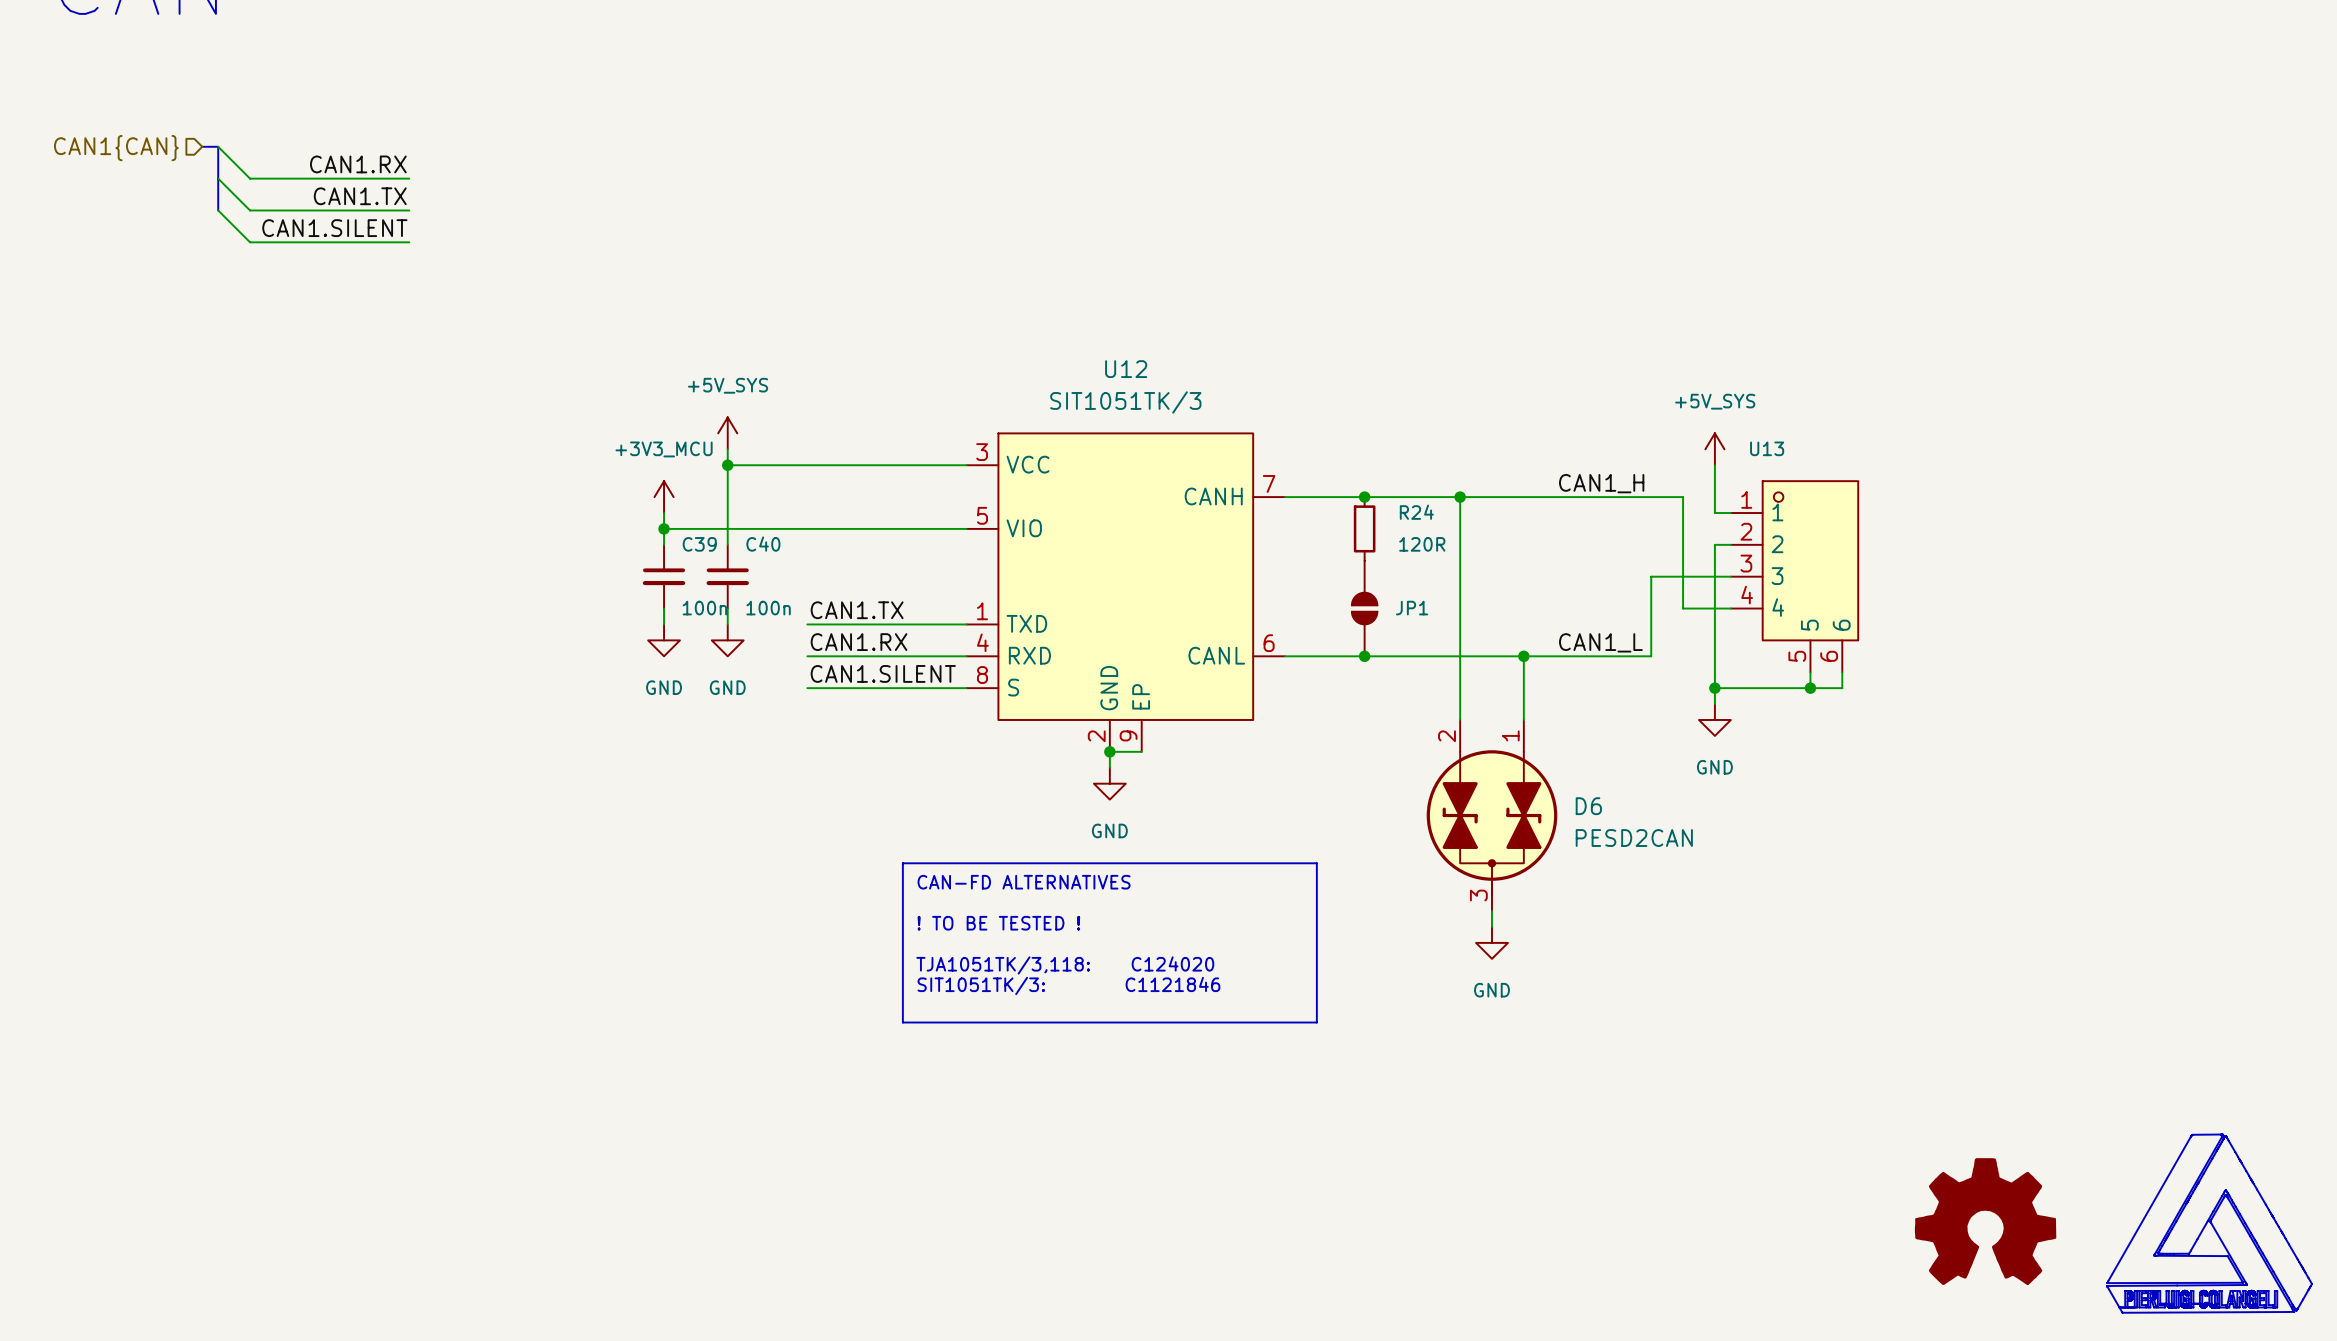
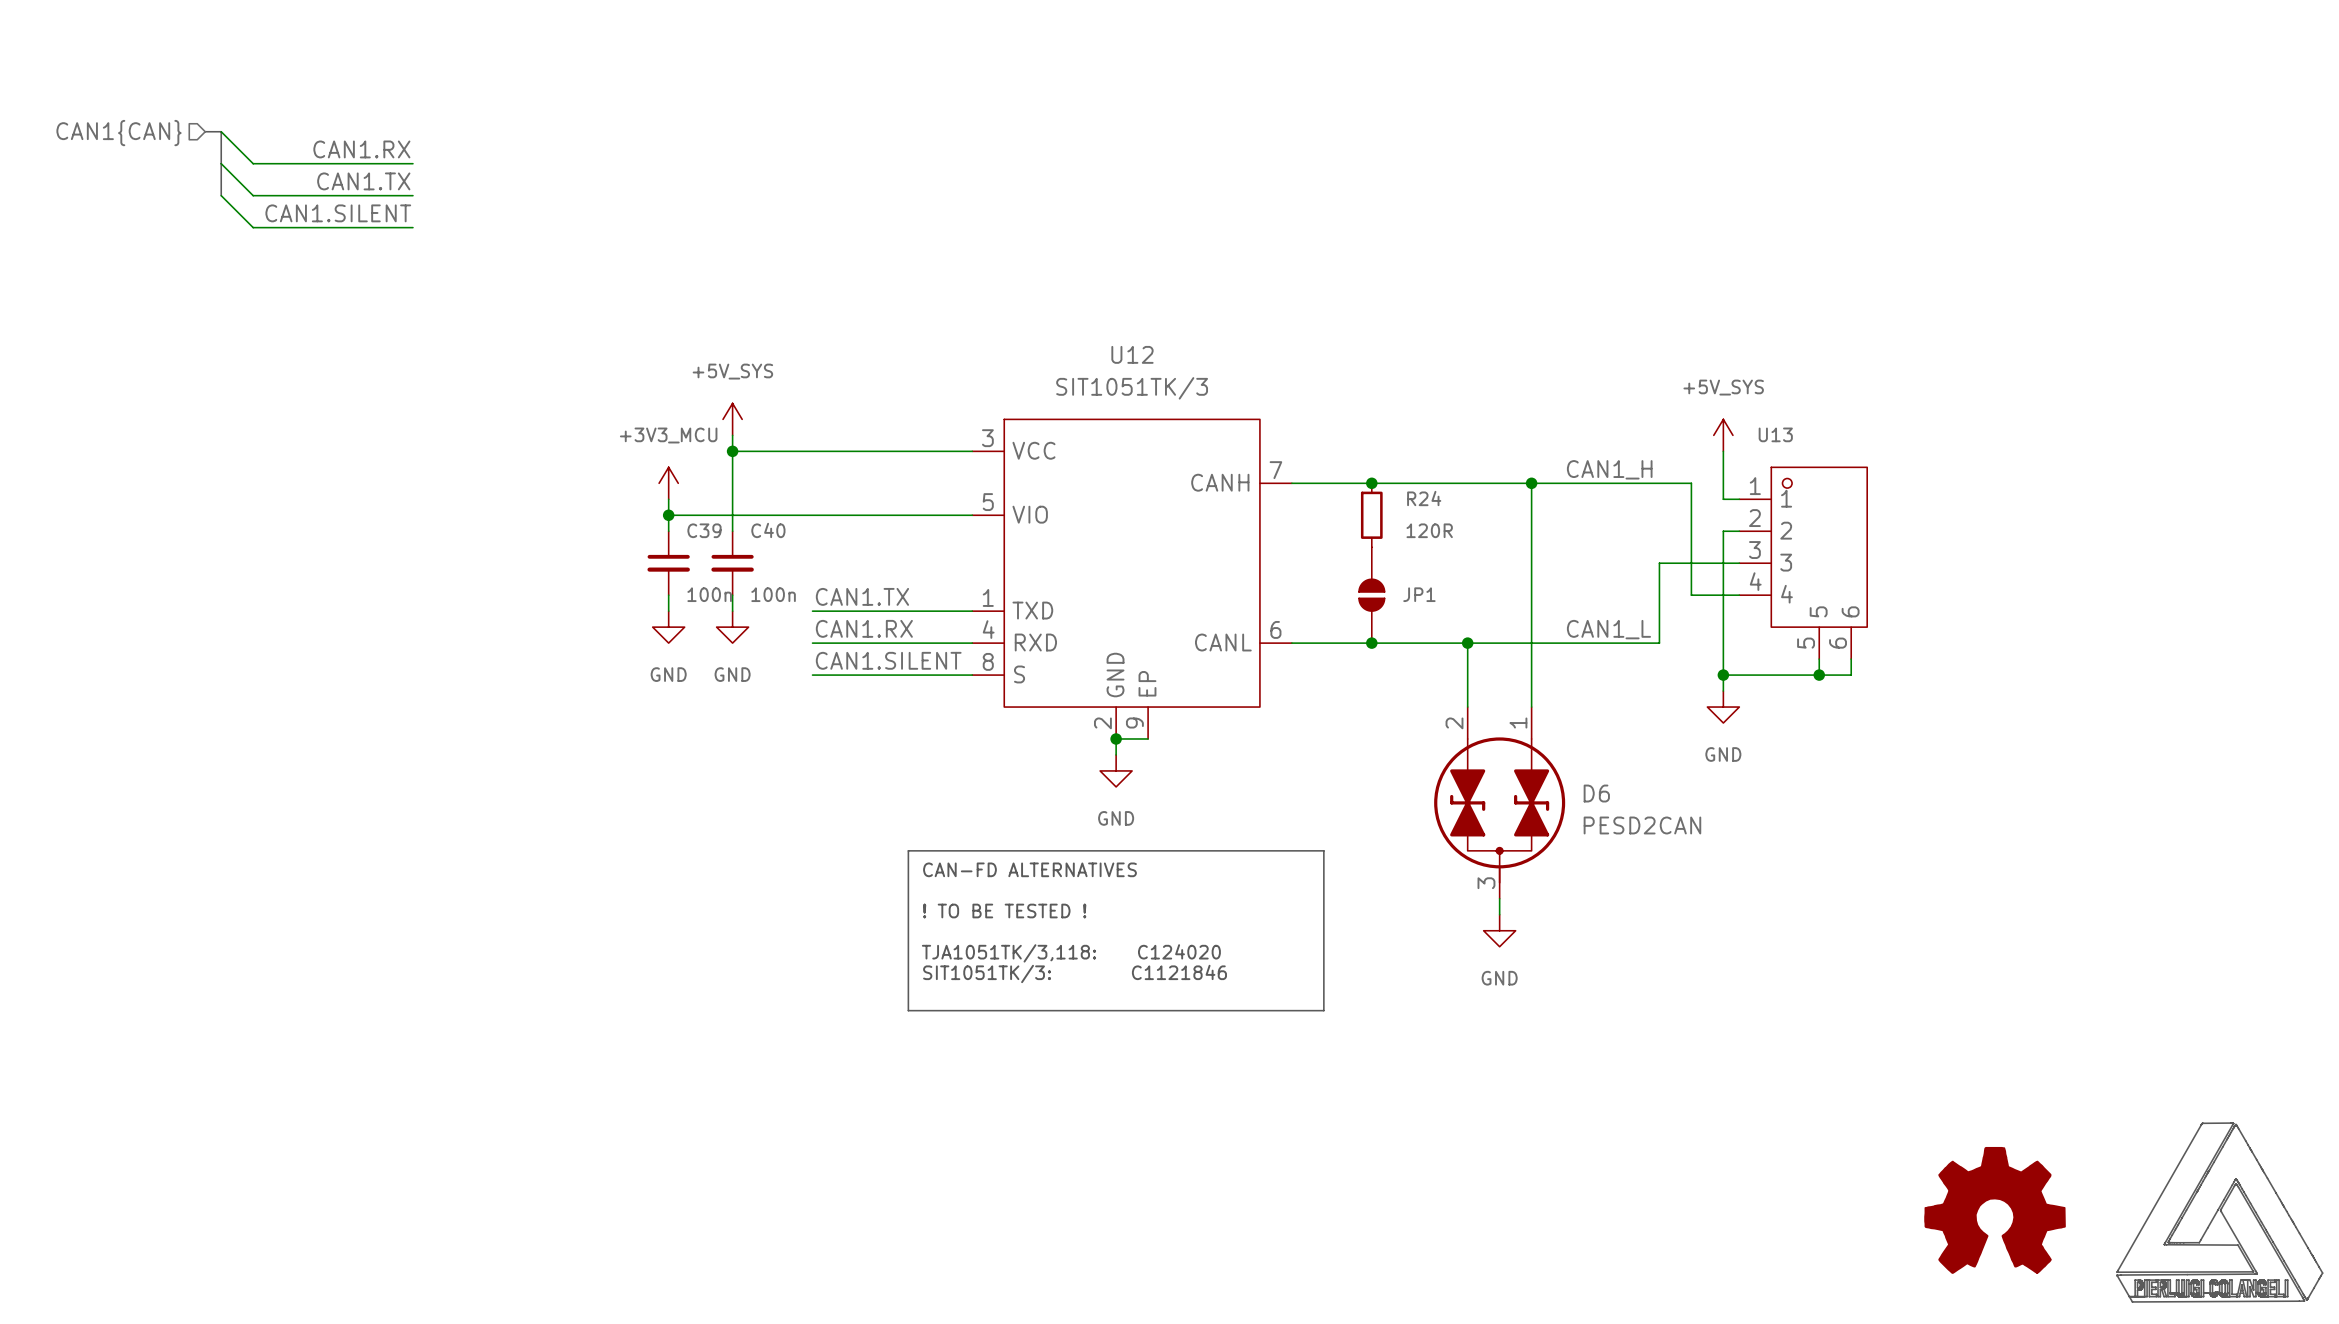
wire: (1460, 497) (1460, 656) -> (1531, 483) (1531, 643)
junction position: (1460, 497) -> (1531, 483)
junction position: (1523, 656) -> (1467, 643)

